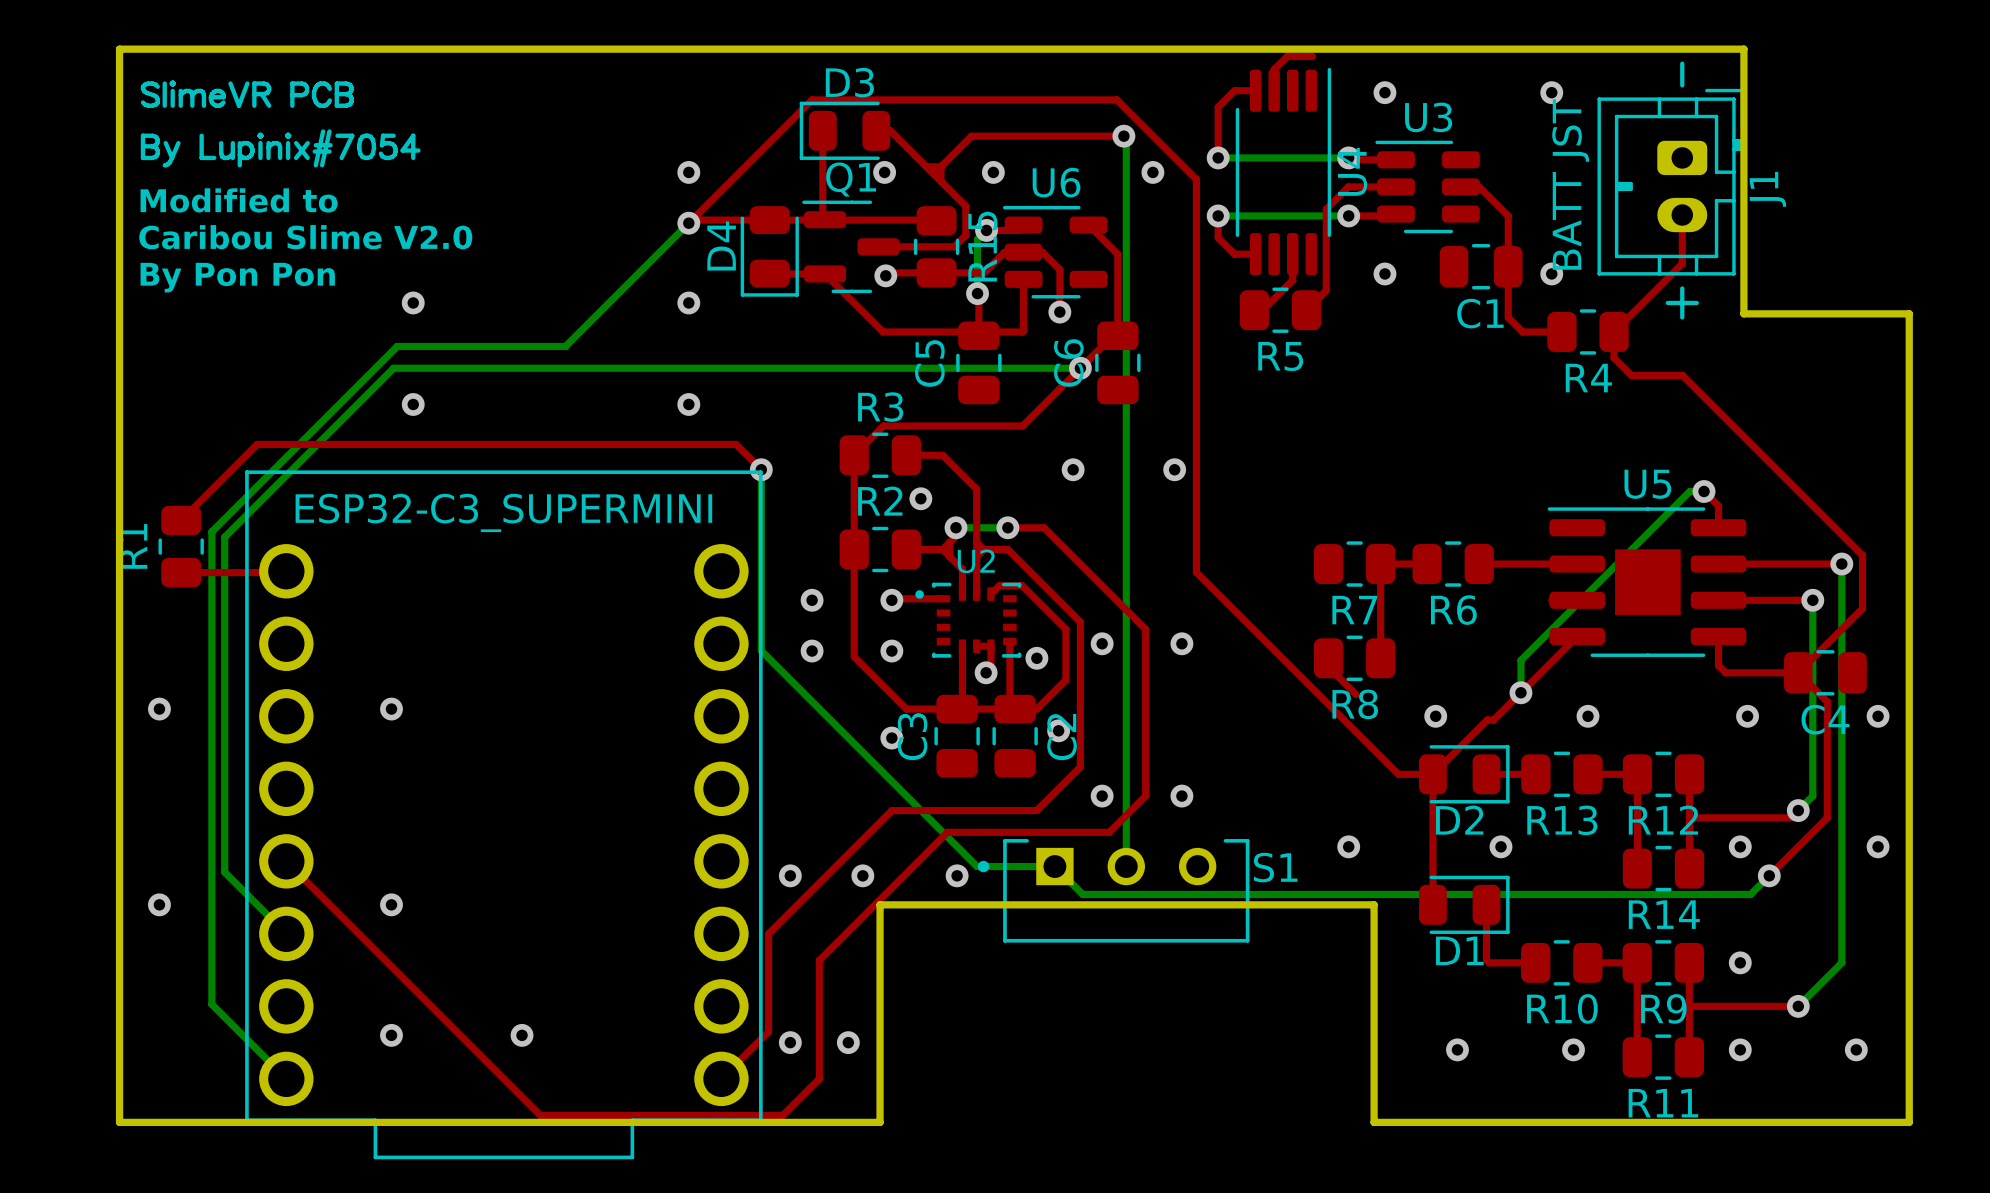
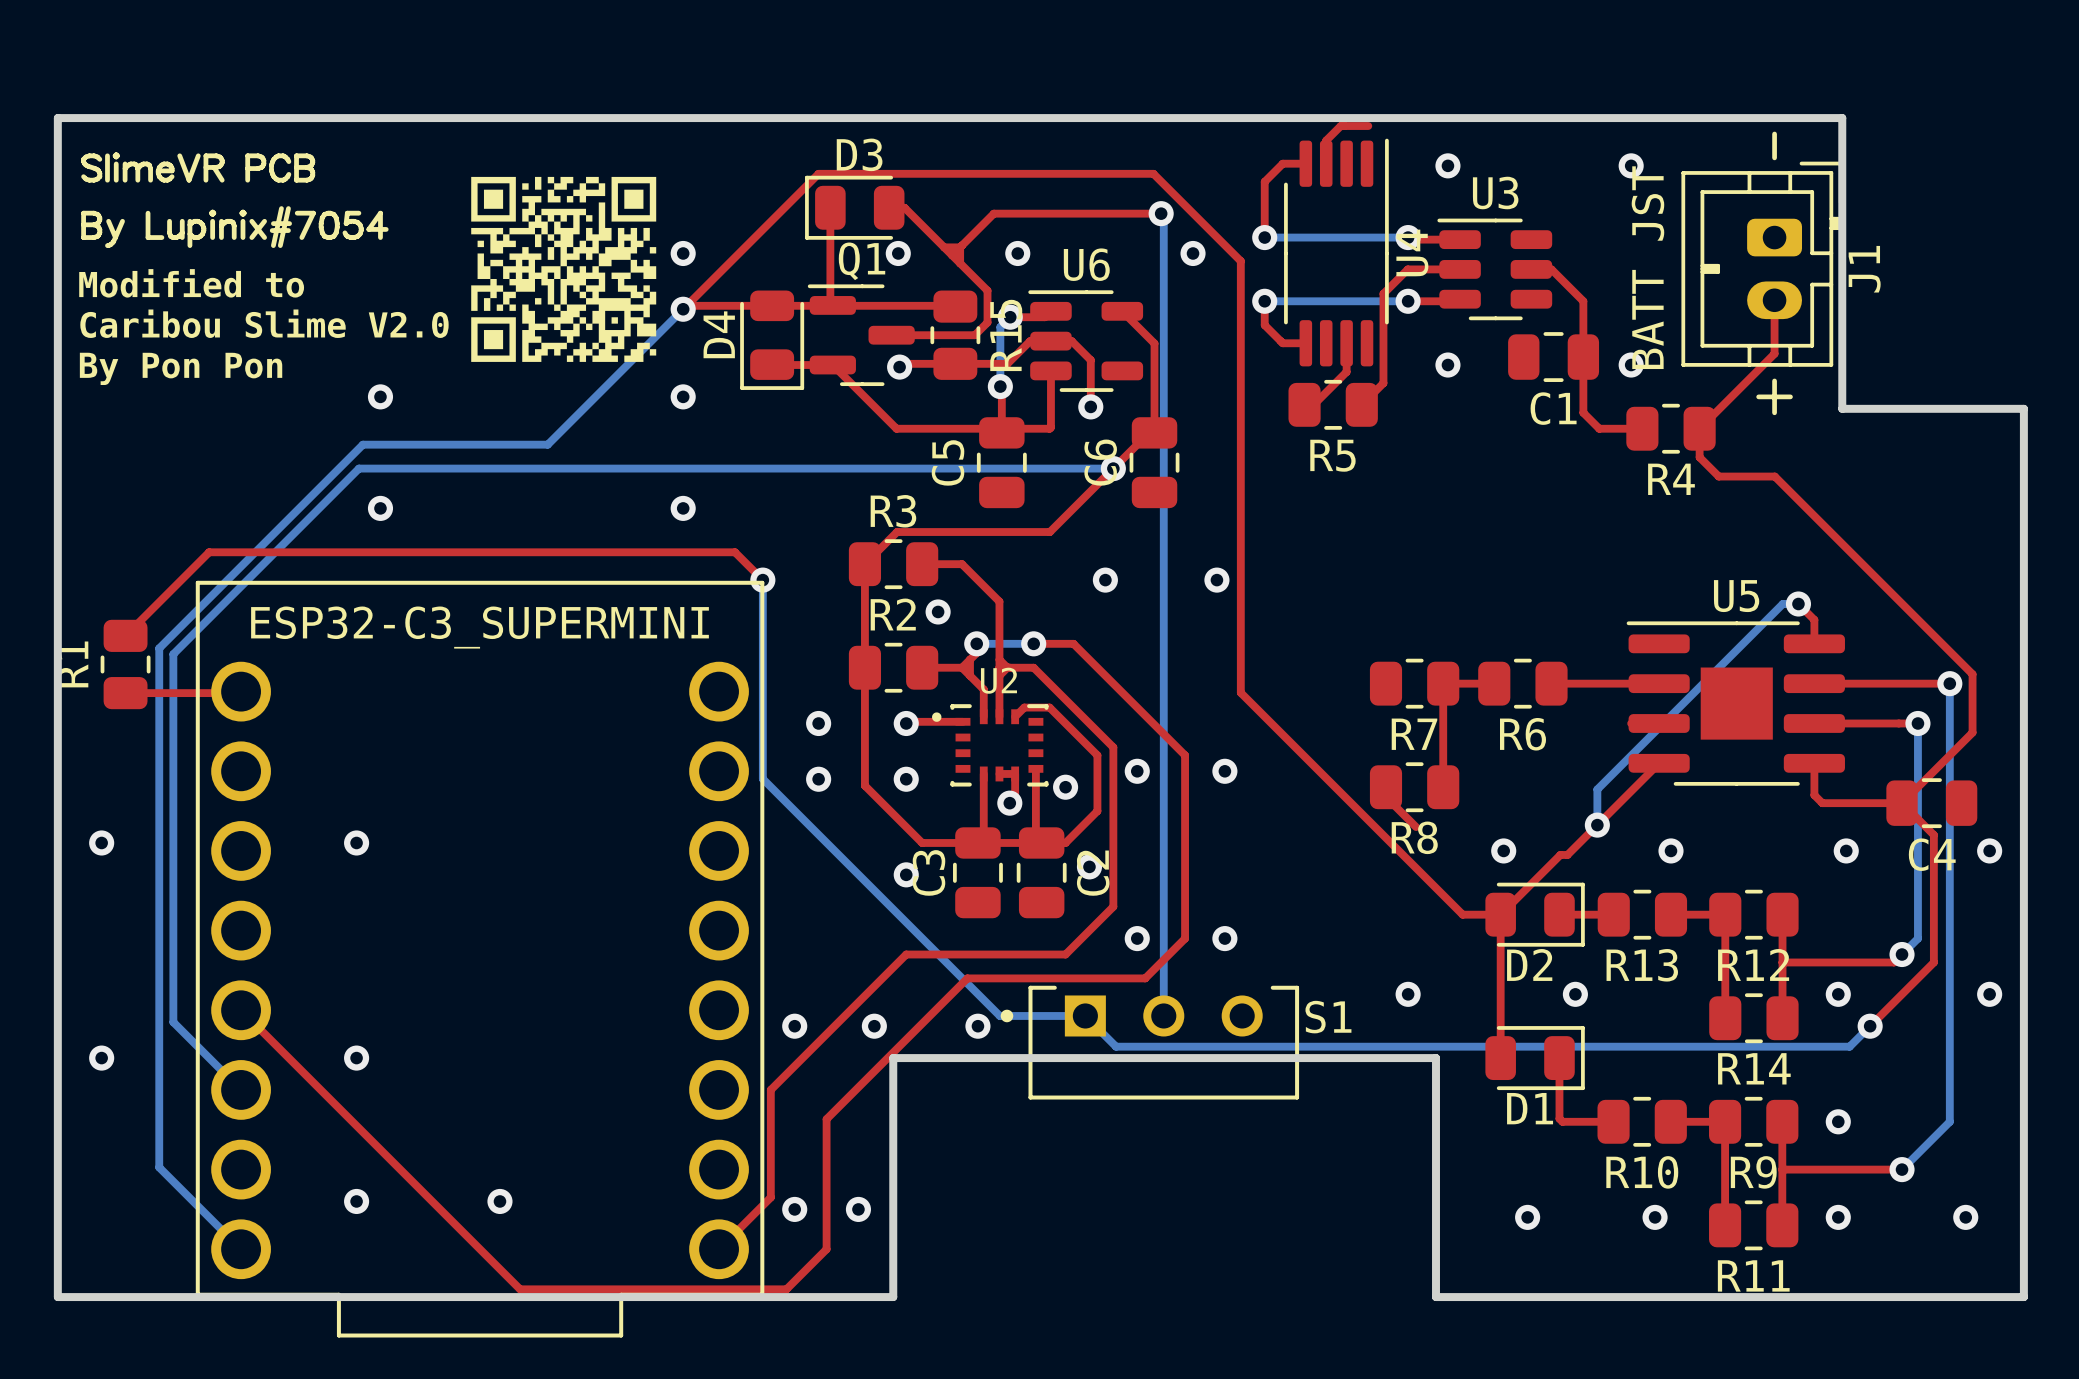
drawing: none -> [471, 176, 657, 362]

